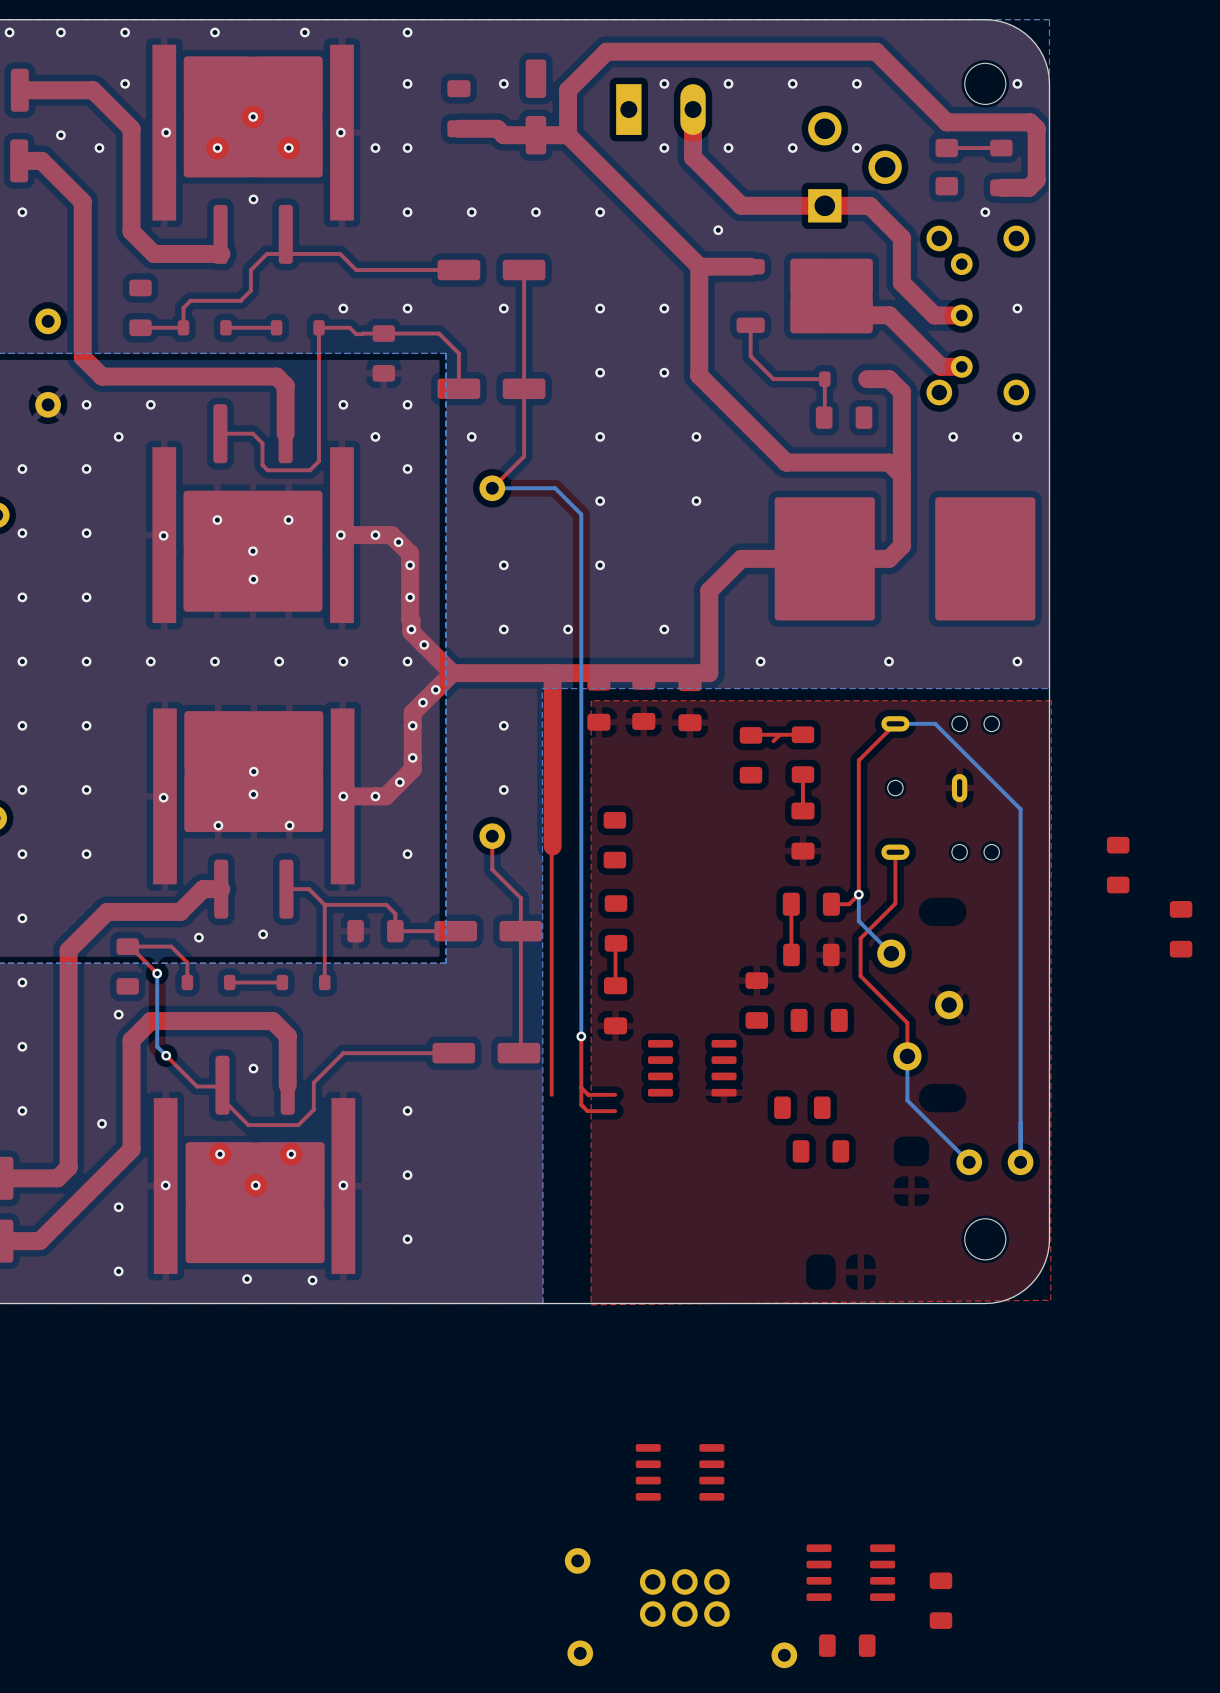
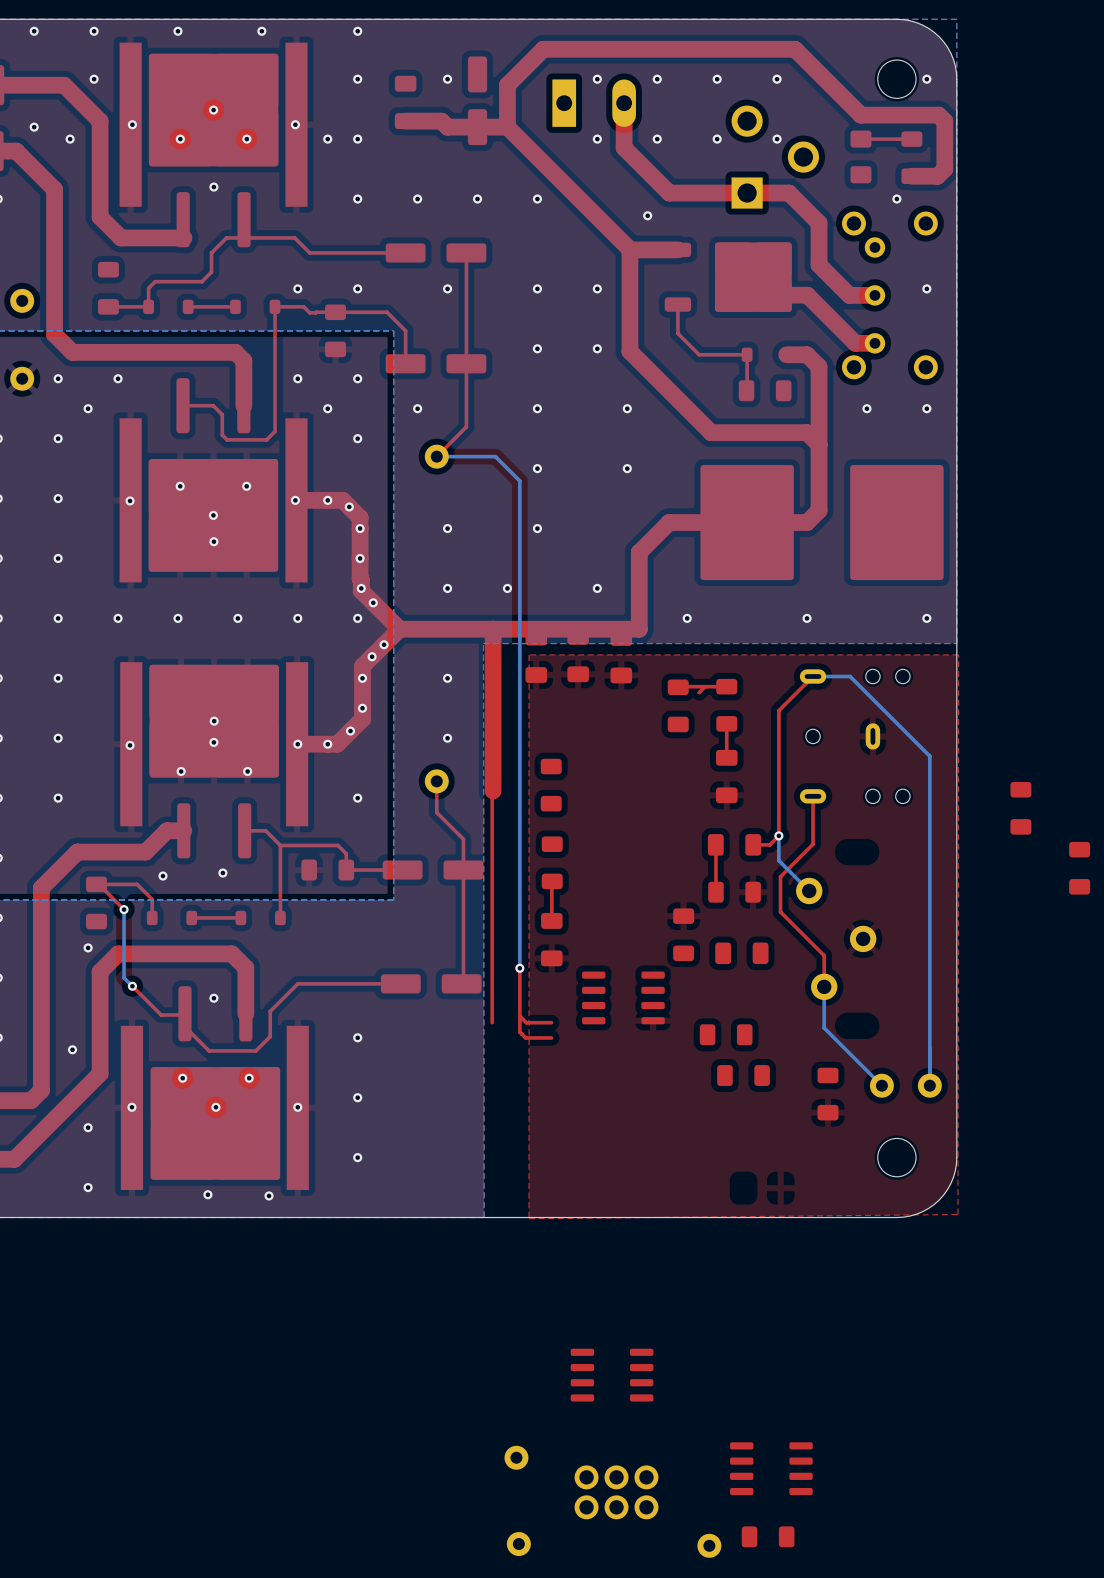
part: none -> (828, 1094)
part: (941, 1600) -> none

